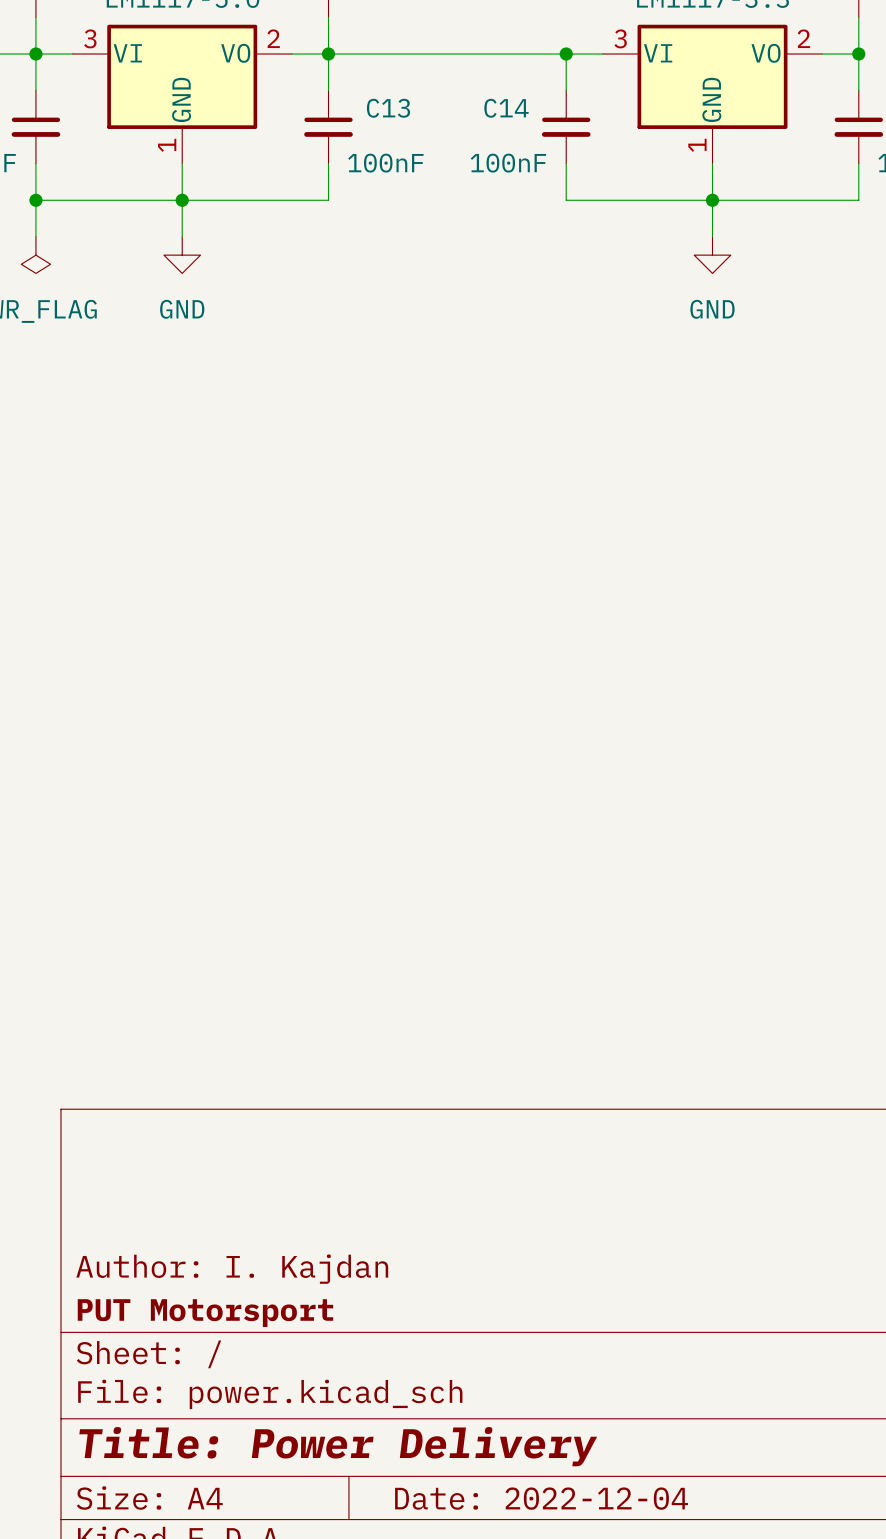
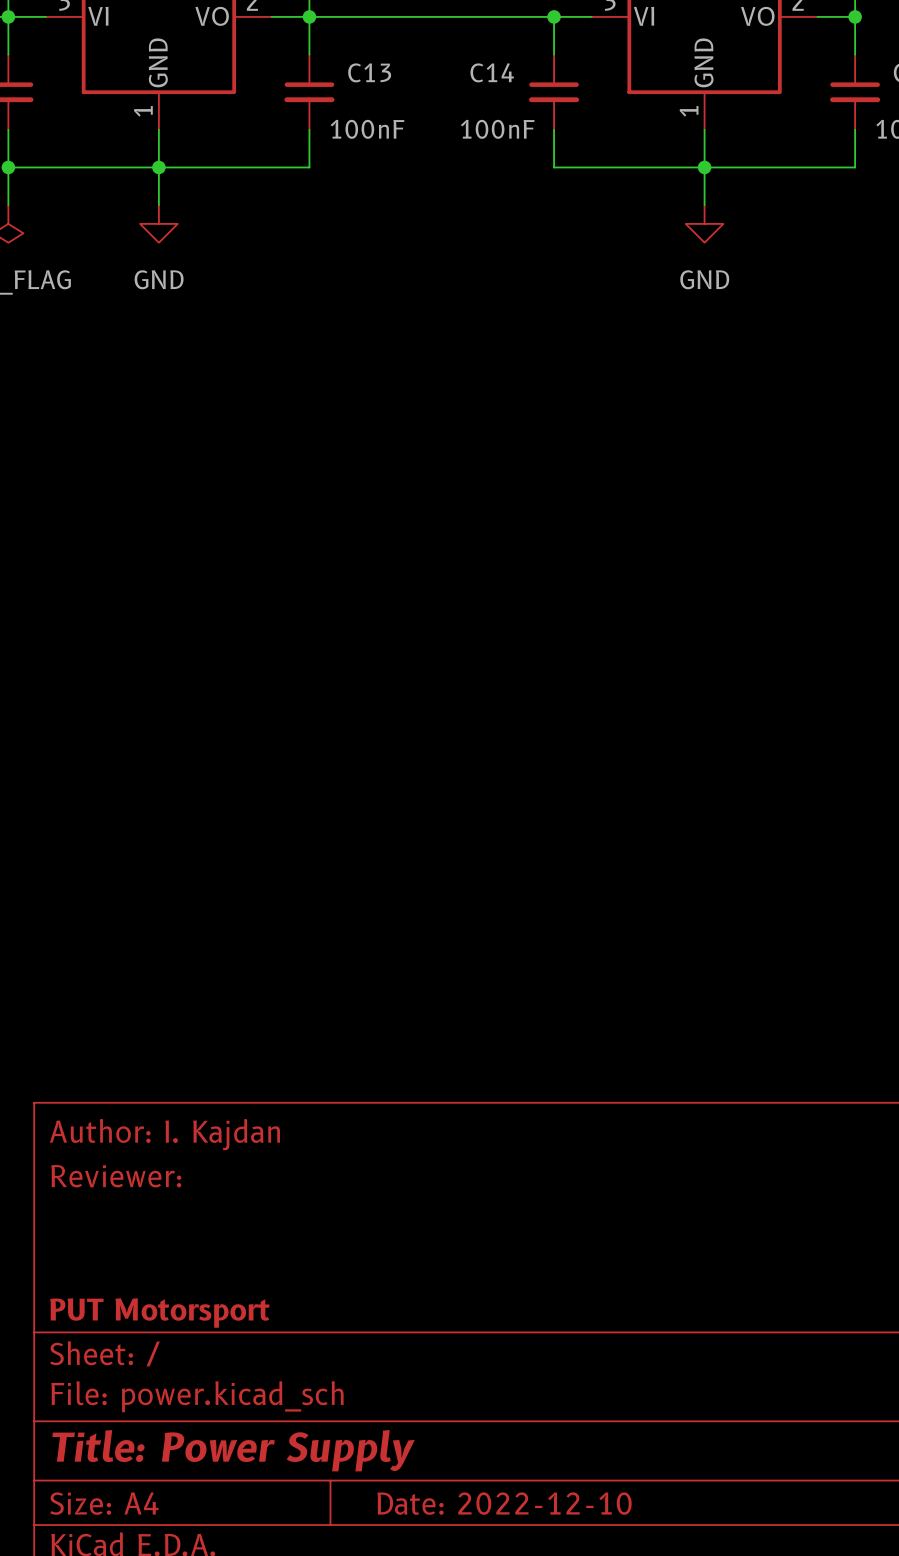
title block: none -> Reviewer: (116, 1176)
title block position: Author: I. Kajdan (232, 1269) -> Author: I. Kajdan (164, 1134)
title block: Title: Power Delivery (338, 1446) -> Title: Power Supply (233, 1450)
title block: Date: 2022-12-04 (541, 1498) -> Date: 2022-12-10 (504, 1503)

